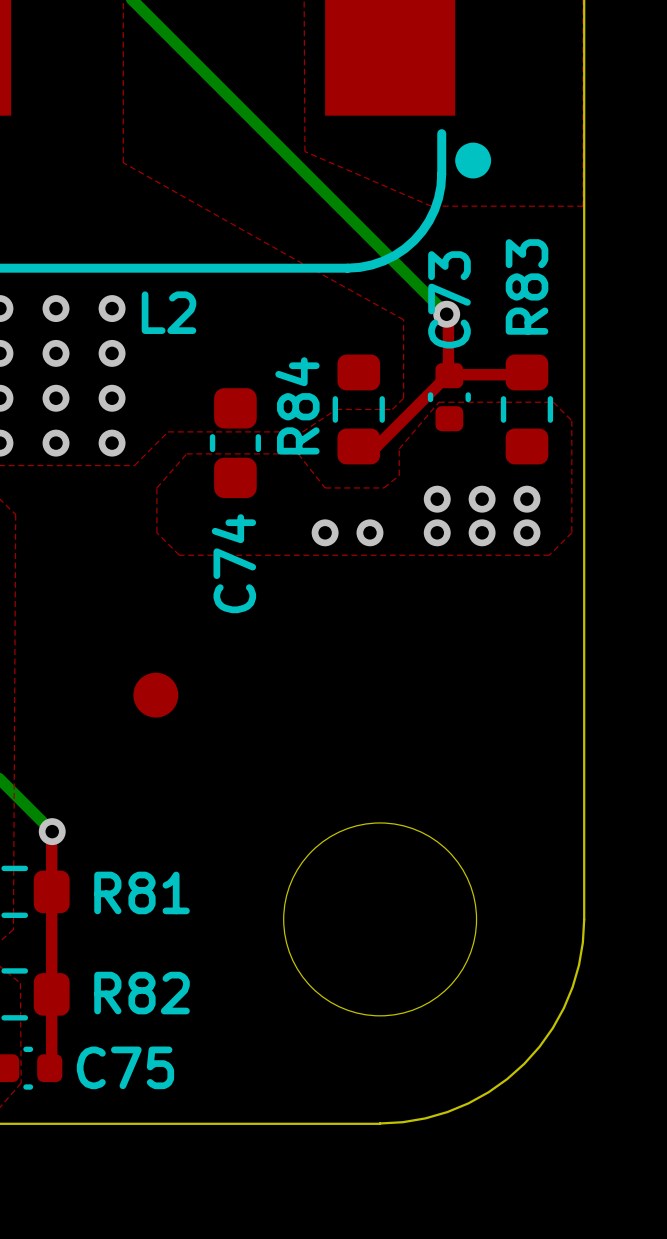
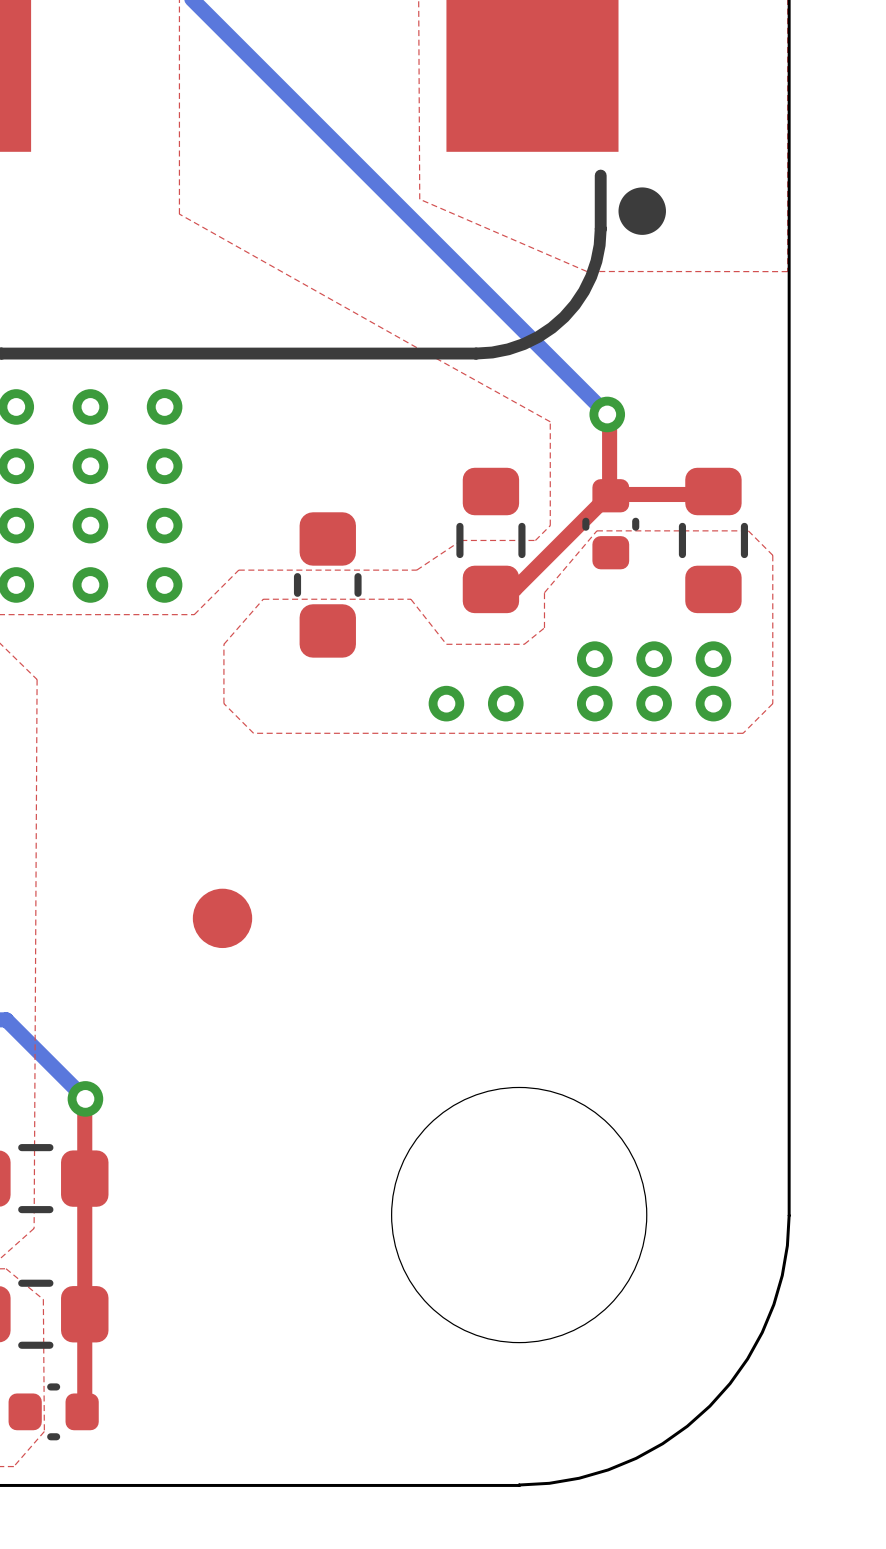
R83 name: R83 (527, 286) -> none
C73 name: C73 (449, 299) -> none
L2 name: L2 (168, 312) -> none
R84 name: R84 (297, 405) -> none
C74 name: C74 (233, 563) -> none
R81 name: R81 (142, 892) -> none
R82 name: R82 (142, 993) -> none
C75 name: C75 (125, 1067) -> none

